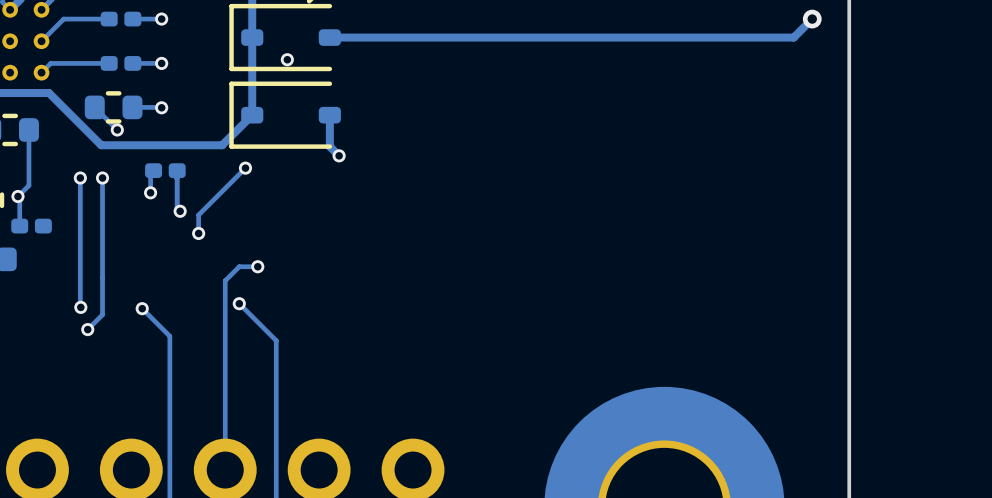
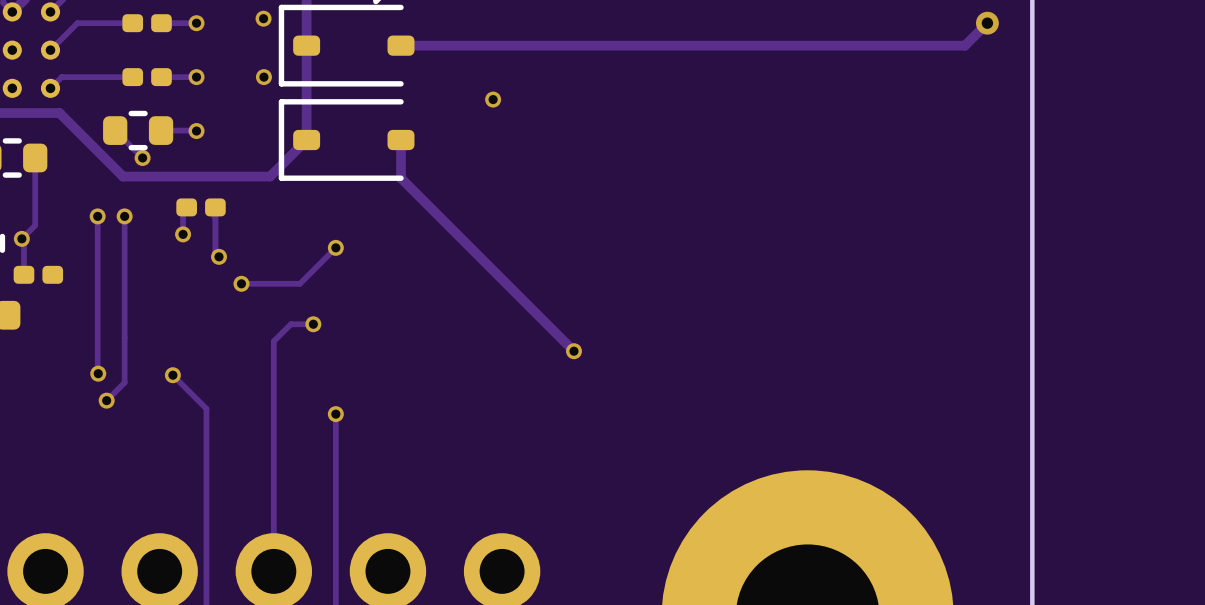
via: none -> (263, 18)
via: (287, 59) -> none
via: none -> (263, 77)
via: none -> (493, 99)
track: none -> (412, 189) (573, 351)
via: (339, 155) -> none
track: (245, 168) (198, 214) (198, 233) -> (335, 247) (299, 283) (241, 283)
via: (245, 168) -> none
via: none -> (335, 247)
via: none -> (573, 351)
track: (239, 303) (276, 340) -> none
via position: (239, 303) -> (335, 414)

